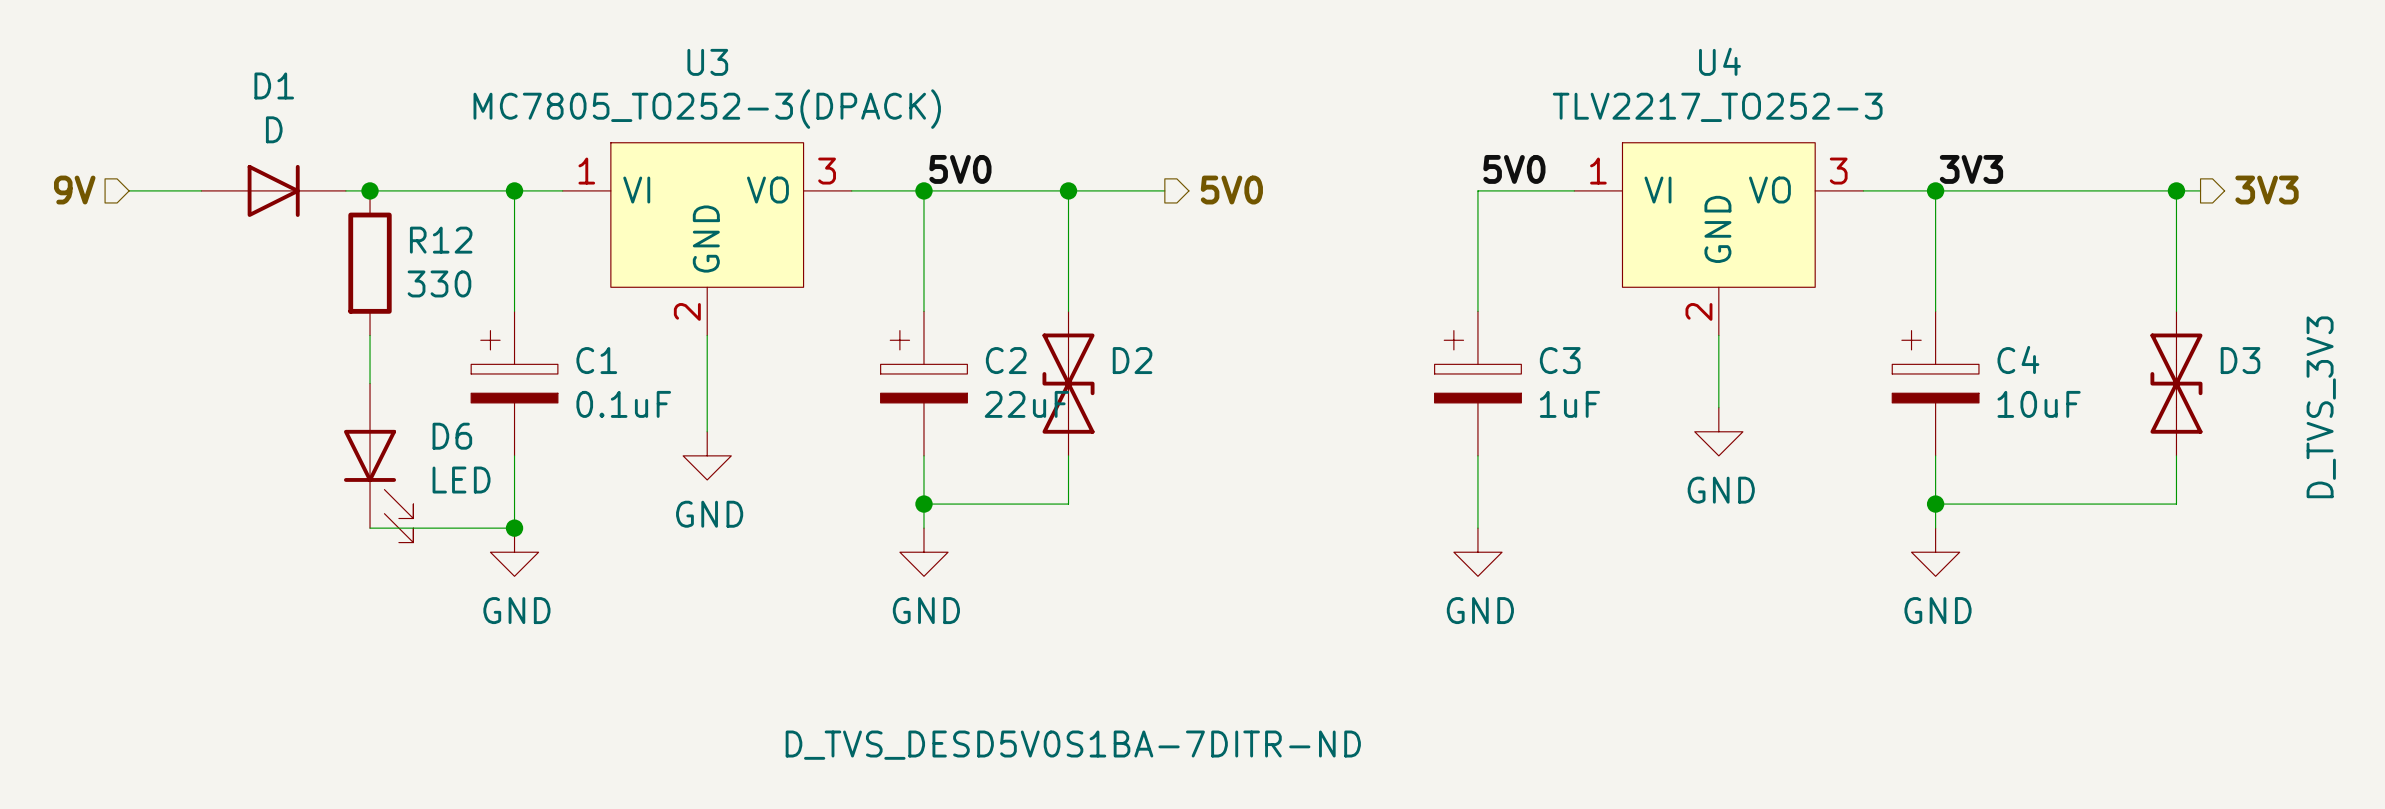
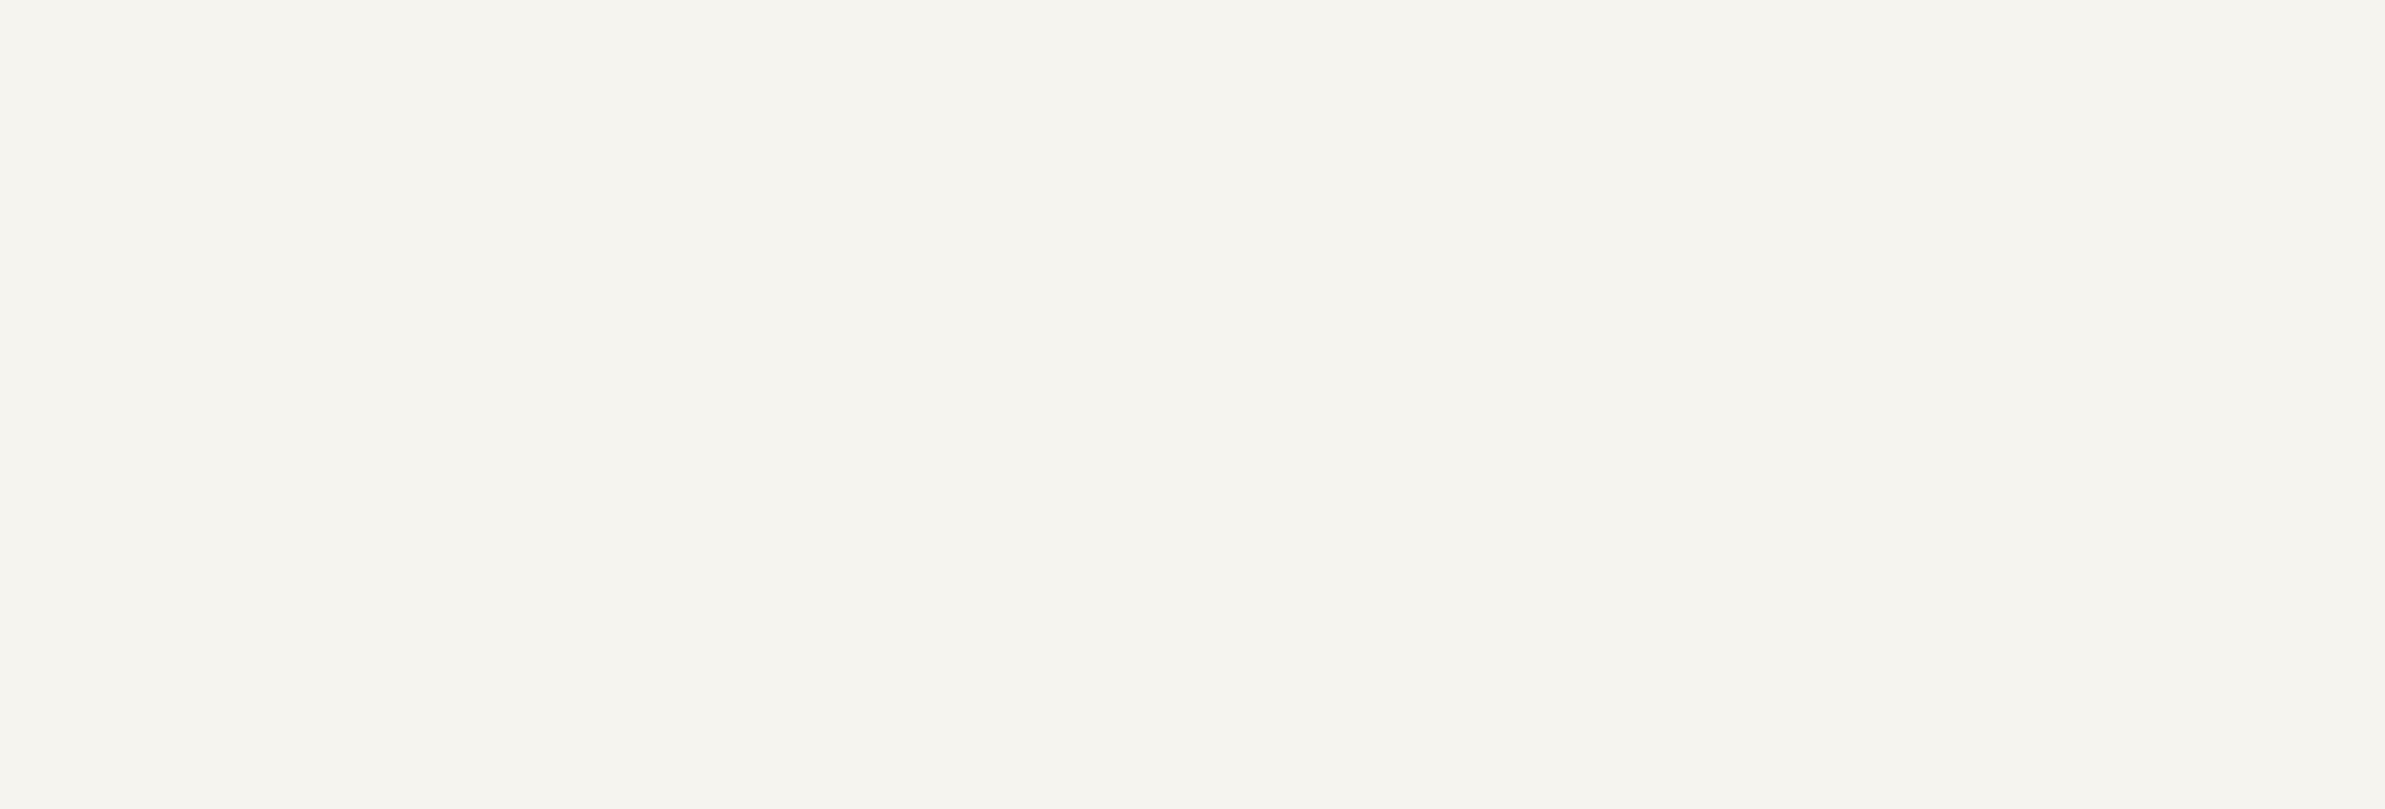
label: 5V0 (960, 169) -> none
label: 5V0 (1514, 169) -> none
label: 3V3 (1971, 169) -> none
hierarchical label: 9V (74, 190) -> none
wire: (129, 190) (201, 190) -> none
D1: D (273, 190) -> none
wire: (345, 190) (562, 190) -> none
junction: (370, 190) -> none
wire: (514, 190) (514, 311) -> none
junction: (514, 190) -> none
wire: (851, 190) (1164, 190) -> none
wire: (923, 190) (923, 311) -> none
junction: (923, 190) -> none
wire: (1068, 190) (1068, 311) -> none
junction: (1068, 190) -> none
hierarchical label: 5V0 (1231, 190) -> none
wire: (1574, 190) (1477, 190) (1477, 311) -> none
wire: (1863, 190) (2200, 190) -> none
wire: (1935, 190) (1935, 311) -> none
junction: (1935, 190) -> none
wire: (2176, 190) (2176, 311) -> none
junction: (2176, 190) -> none
hierarchical label: 3V3 (2267, 190) -> none
U3: MC7805_TO252-3(DPACK) (707, 239) -> none
U4: TLV2217_TO252-3 (1718, 239) -> none
R12: 330 (370, 263) -> none
wire: (370, 335) (370, 383) -> none
wire: (707, 335) (707, 431) -> none
wire: (1718, 335) (1718, 407) -> none
C1: 0.1uF (514, 383) -> none
C2: 22uF (923, 383) -> none
D2: D_TVS_DESD5V0S1BA-7DITR-ND (1068, 383) -> none
C3: 1uF (1477, 383) -> none
C4: 10uF (1935, 383) -> none
D3: D_TVS_3V3 (2176, 383) -> none
power symbol: GND (1718, 431) -> none
wire: (514, 455) (514, 528) (370, 528) -> none
power symbol: GND (707, 455) -> none
wire: (923, 455) (923, 528) -> none
wire: (1068, 455) (1068, 504) (923, 504) -> none
wire: (1477, 455) (1477, 528) -> none
wire: (1935, 455) (1935, 528) -> none
wire: (2176, 455) (2176, 504) (1935, 504) -> none
D6: LED (378, 463) -> none
junction: (923, 504) -> none
junction: (1935, 504) -> none
junction: (514, 528) -> none
power symbol: GND (514, 552) -> none
power symbol: GND (923, 552) -> none
power symbol: GND (1477, 552) -> none
power symbol: GND (1935, 552) -> none

